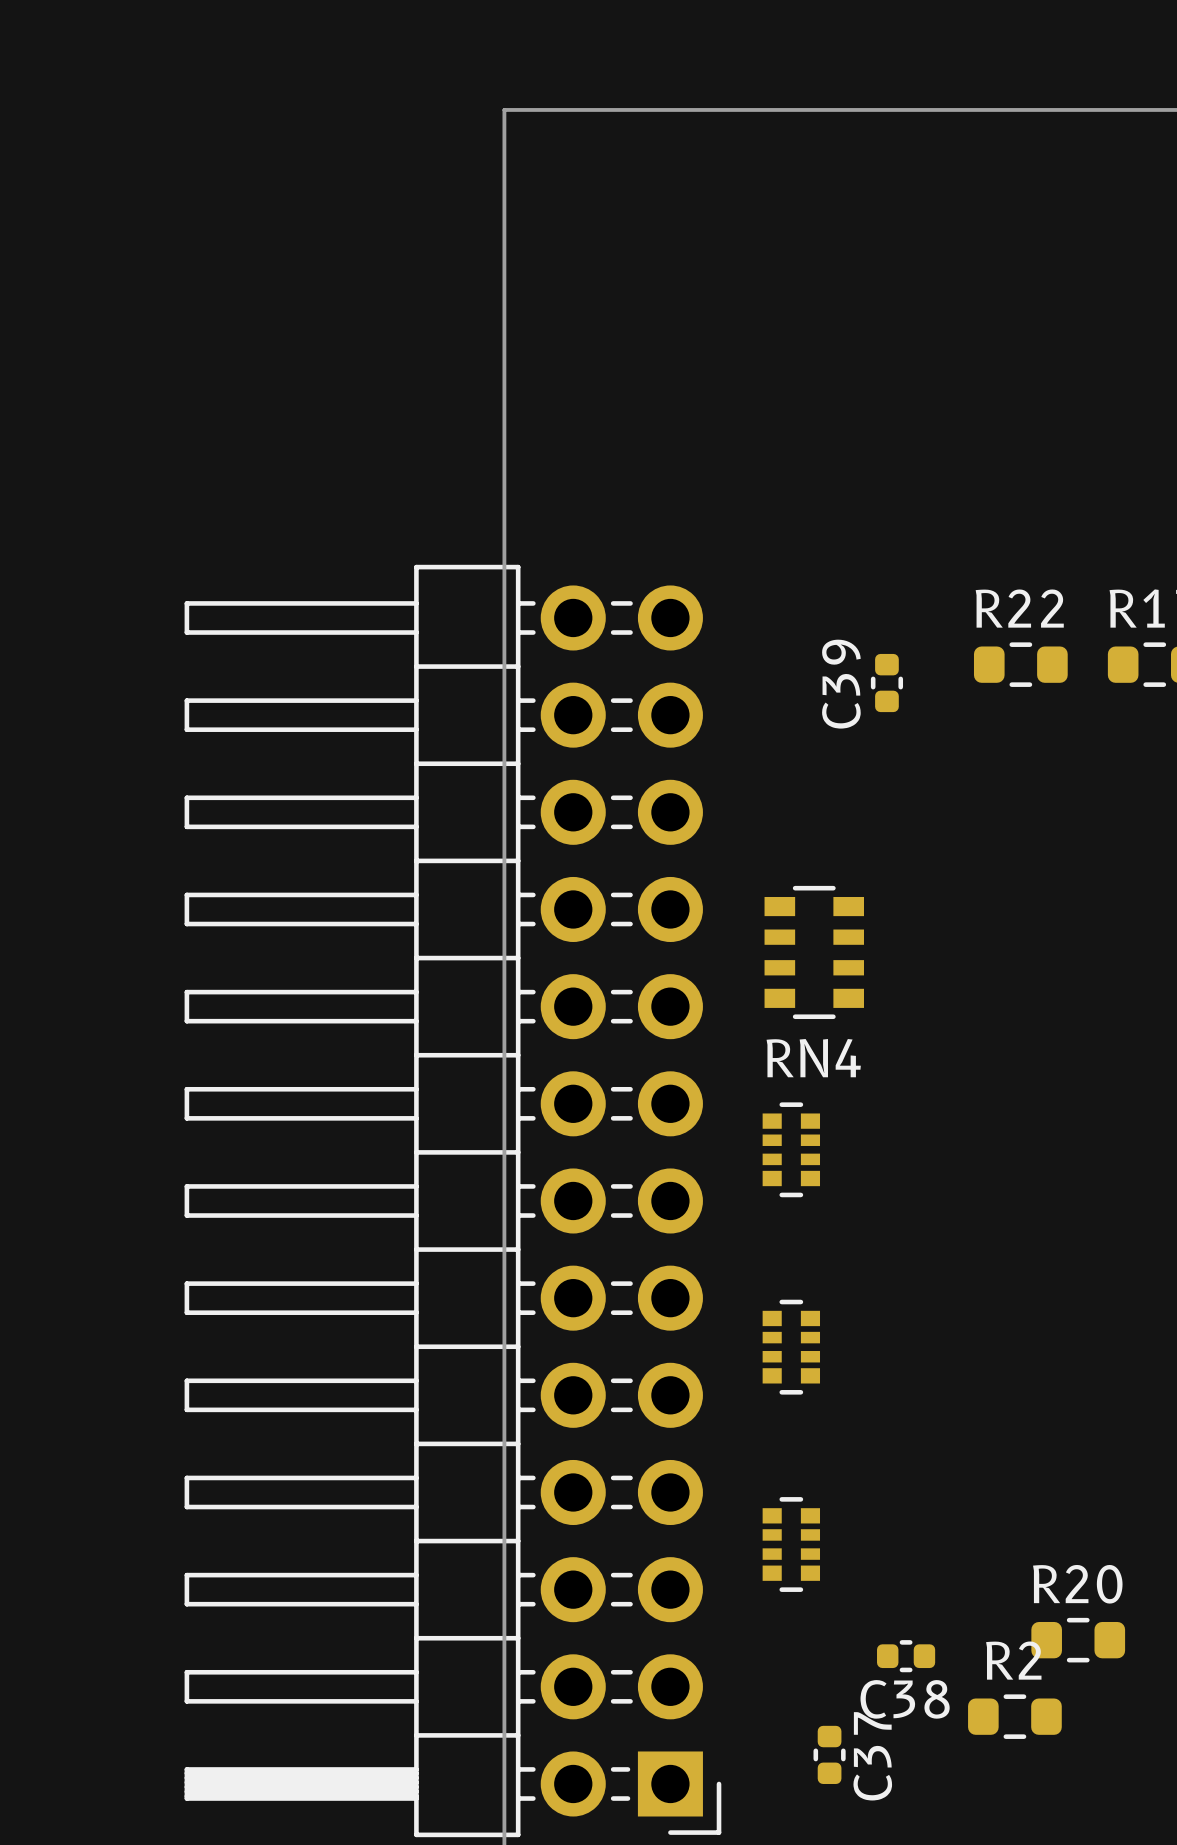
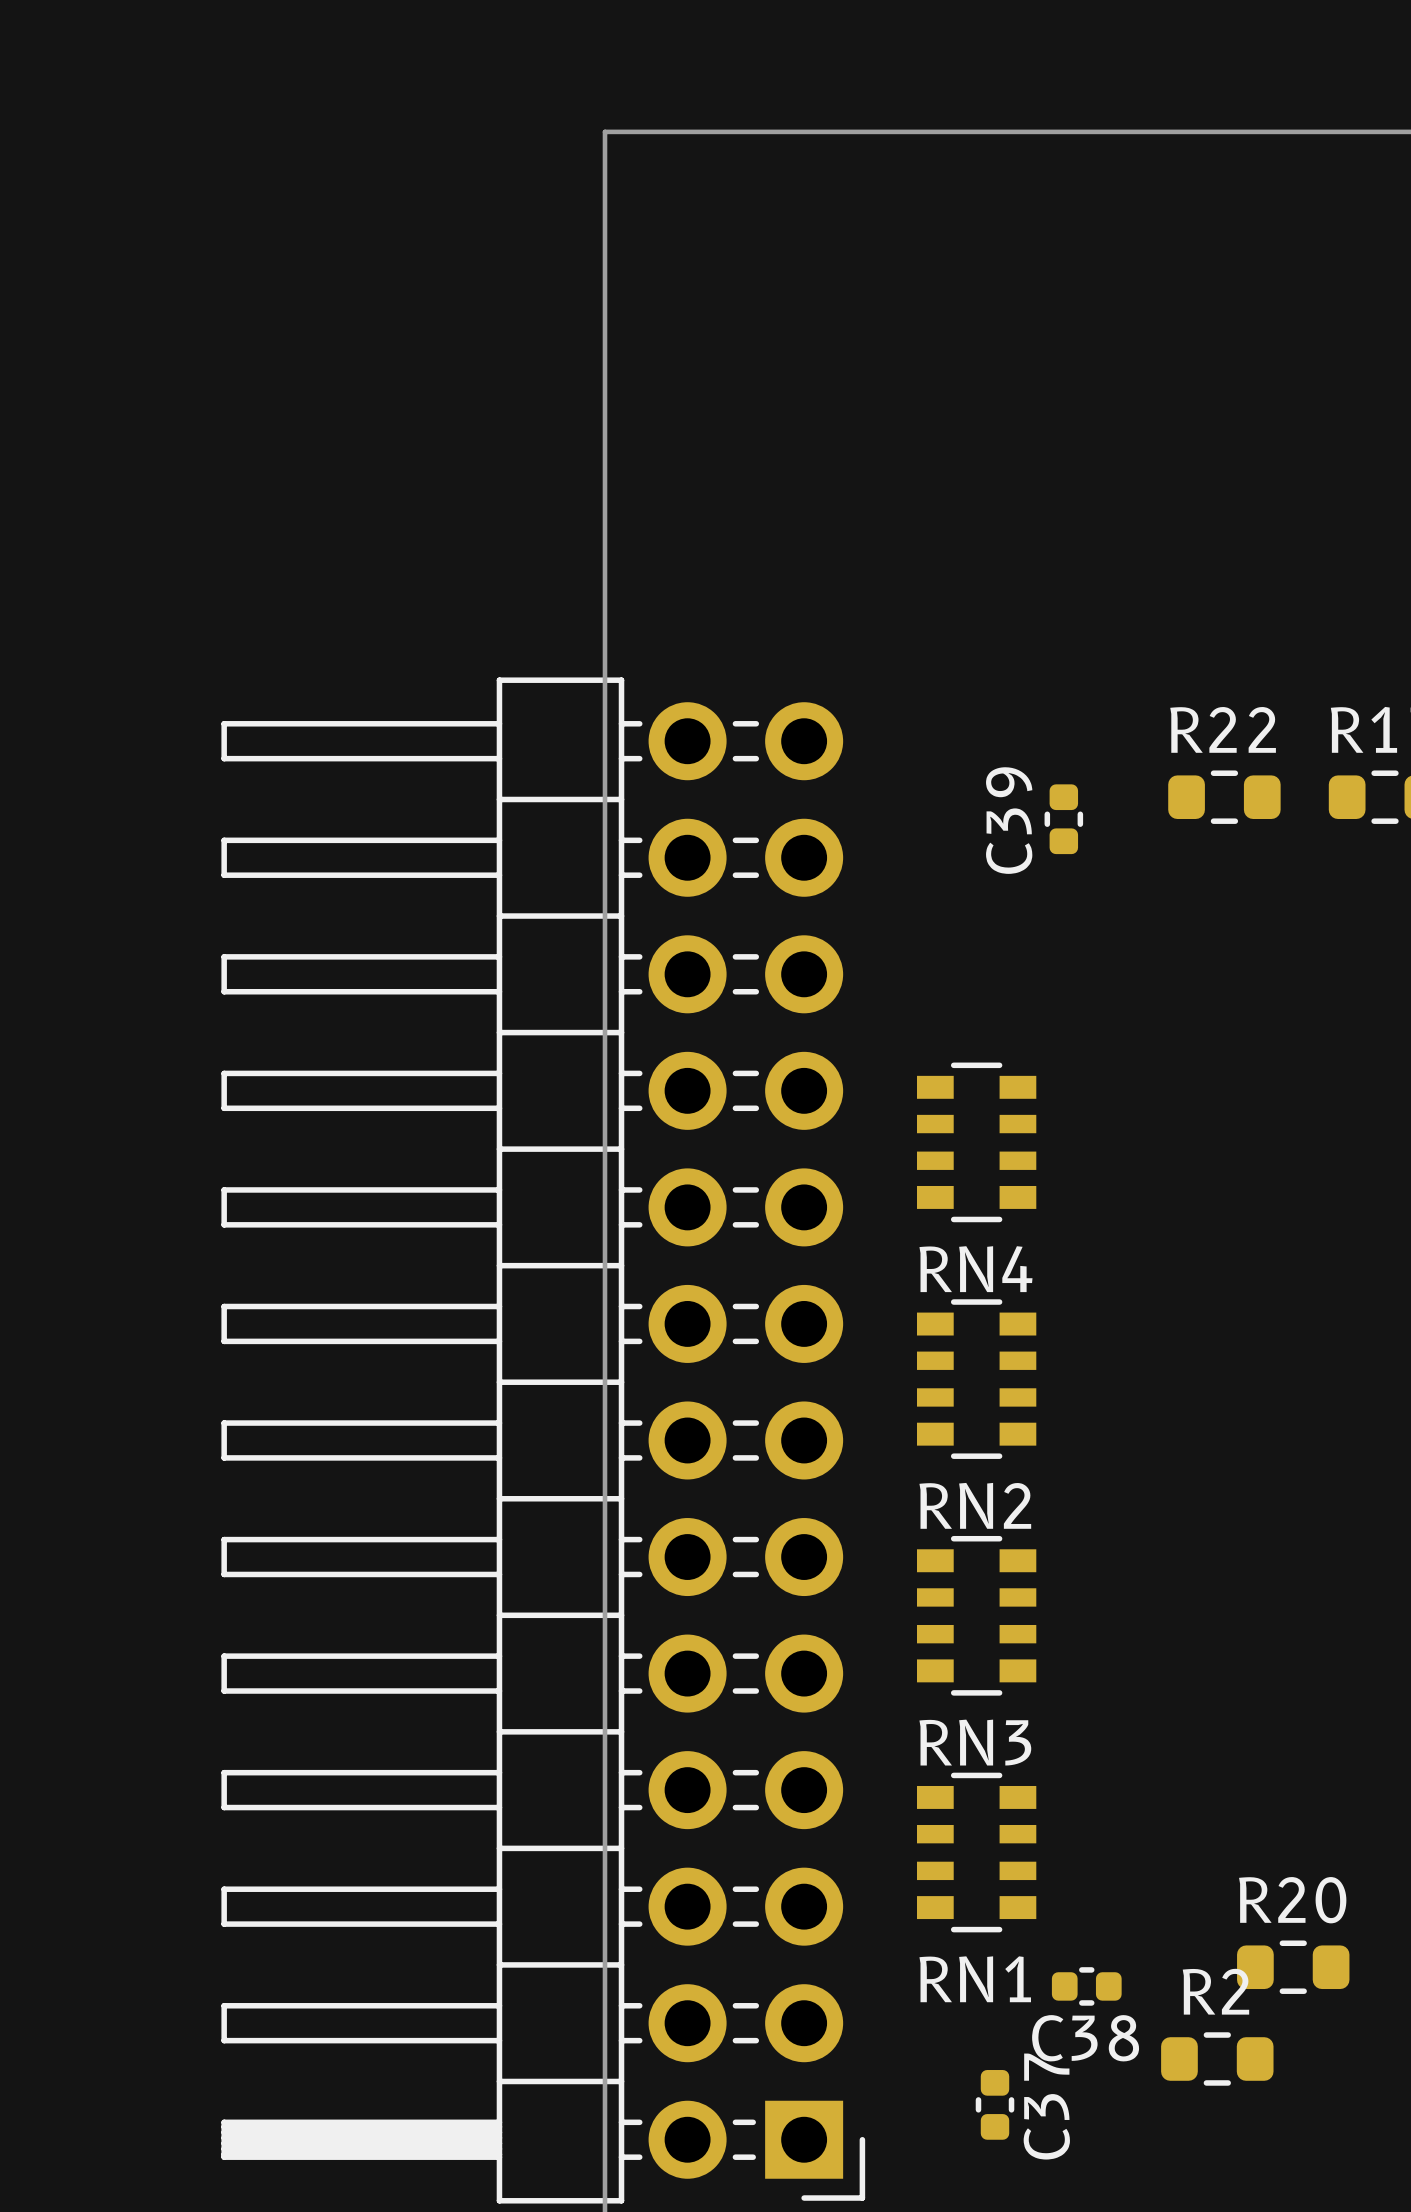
part: (791, 1149) -> none
RN2: none -> (976, 1379)
part: (791, 1347) -> none
RN3: none -> (976, 1615)
part: (791, 1544) -> none
RN1: none -> (976, 1852)

